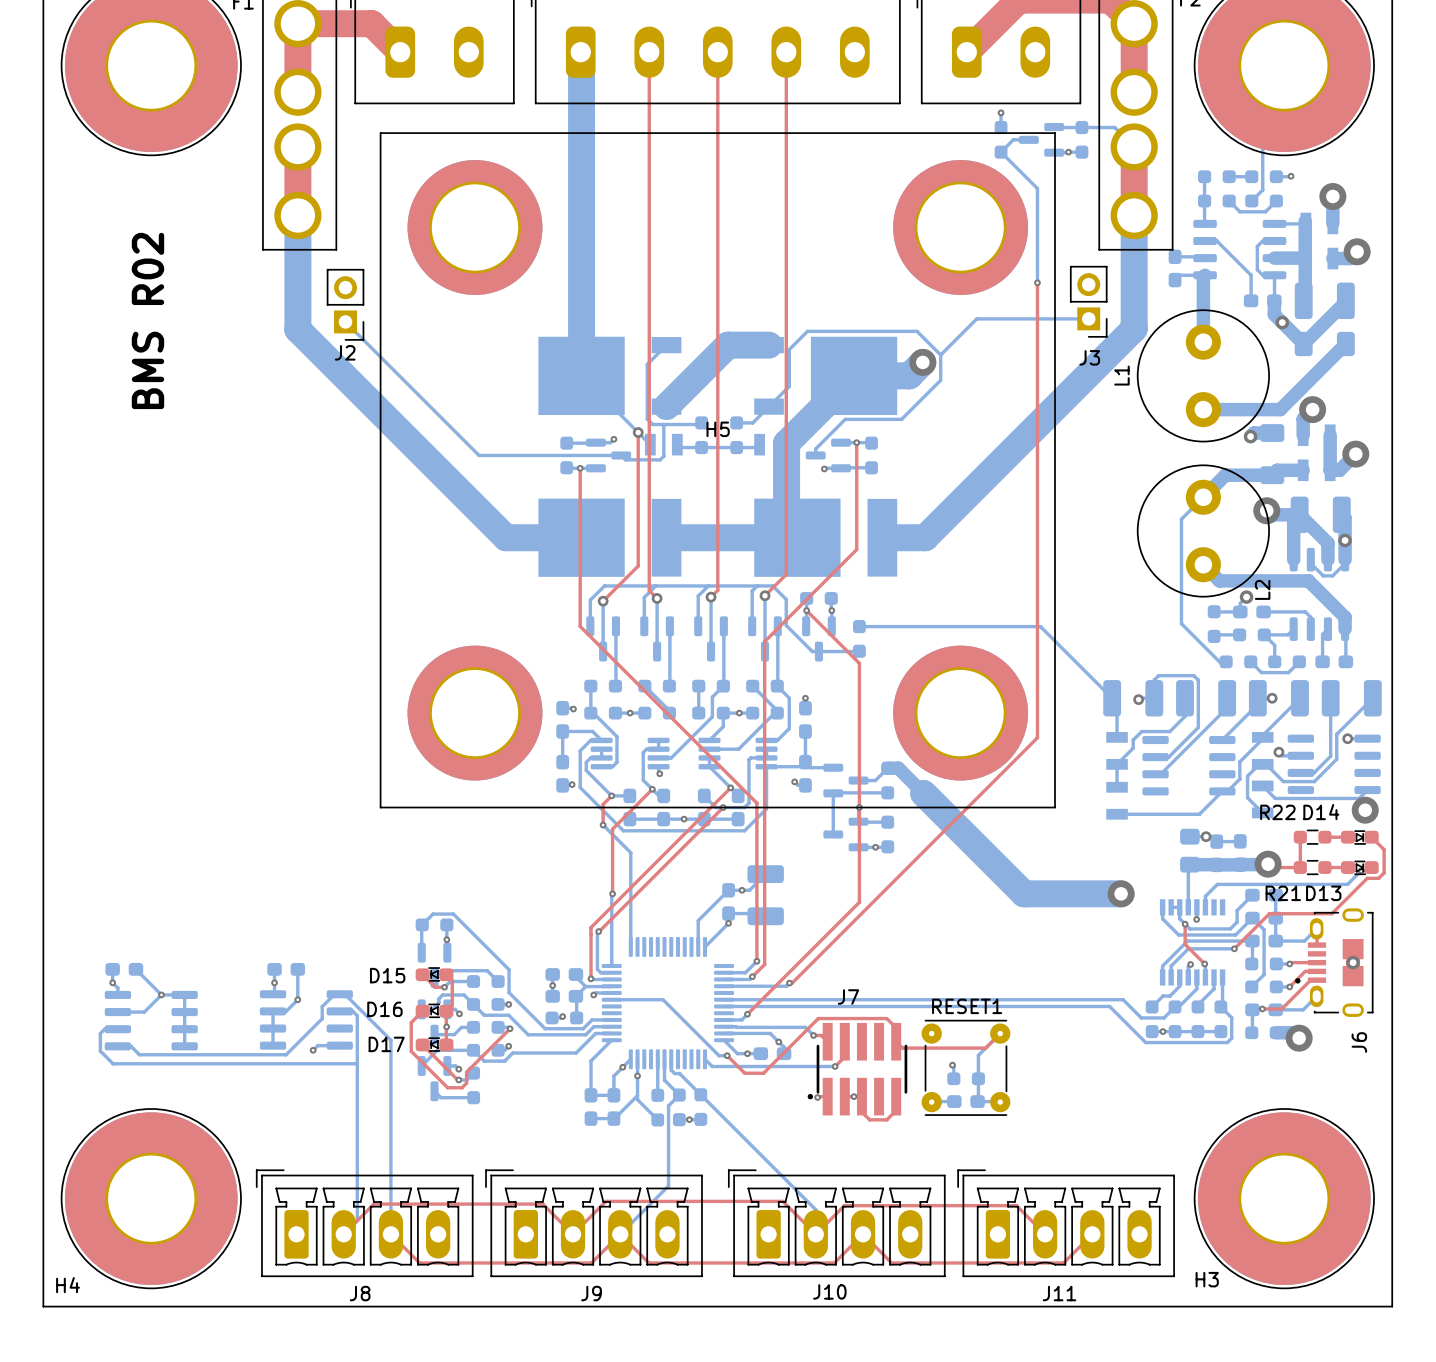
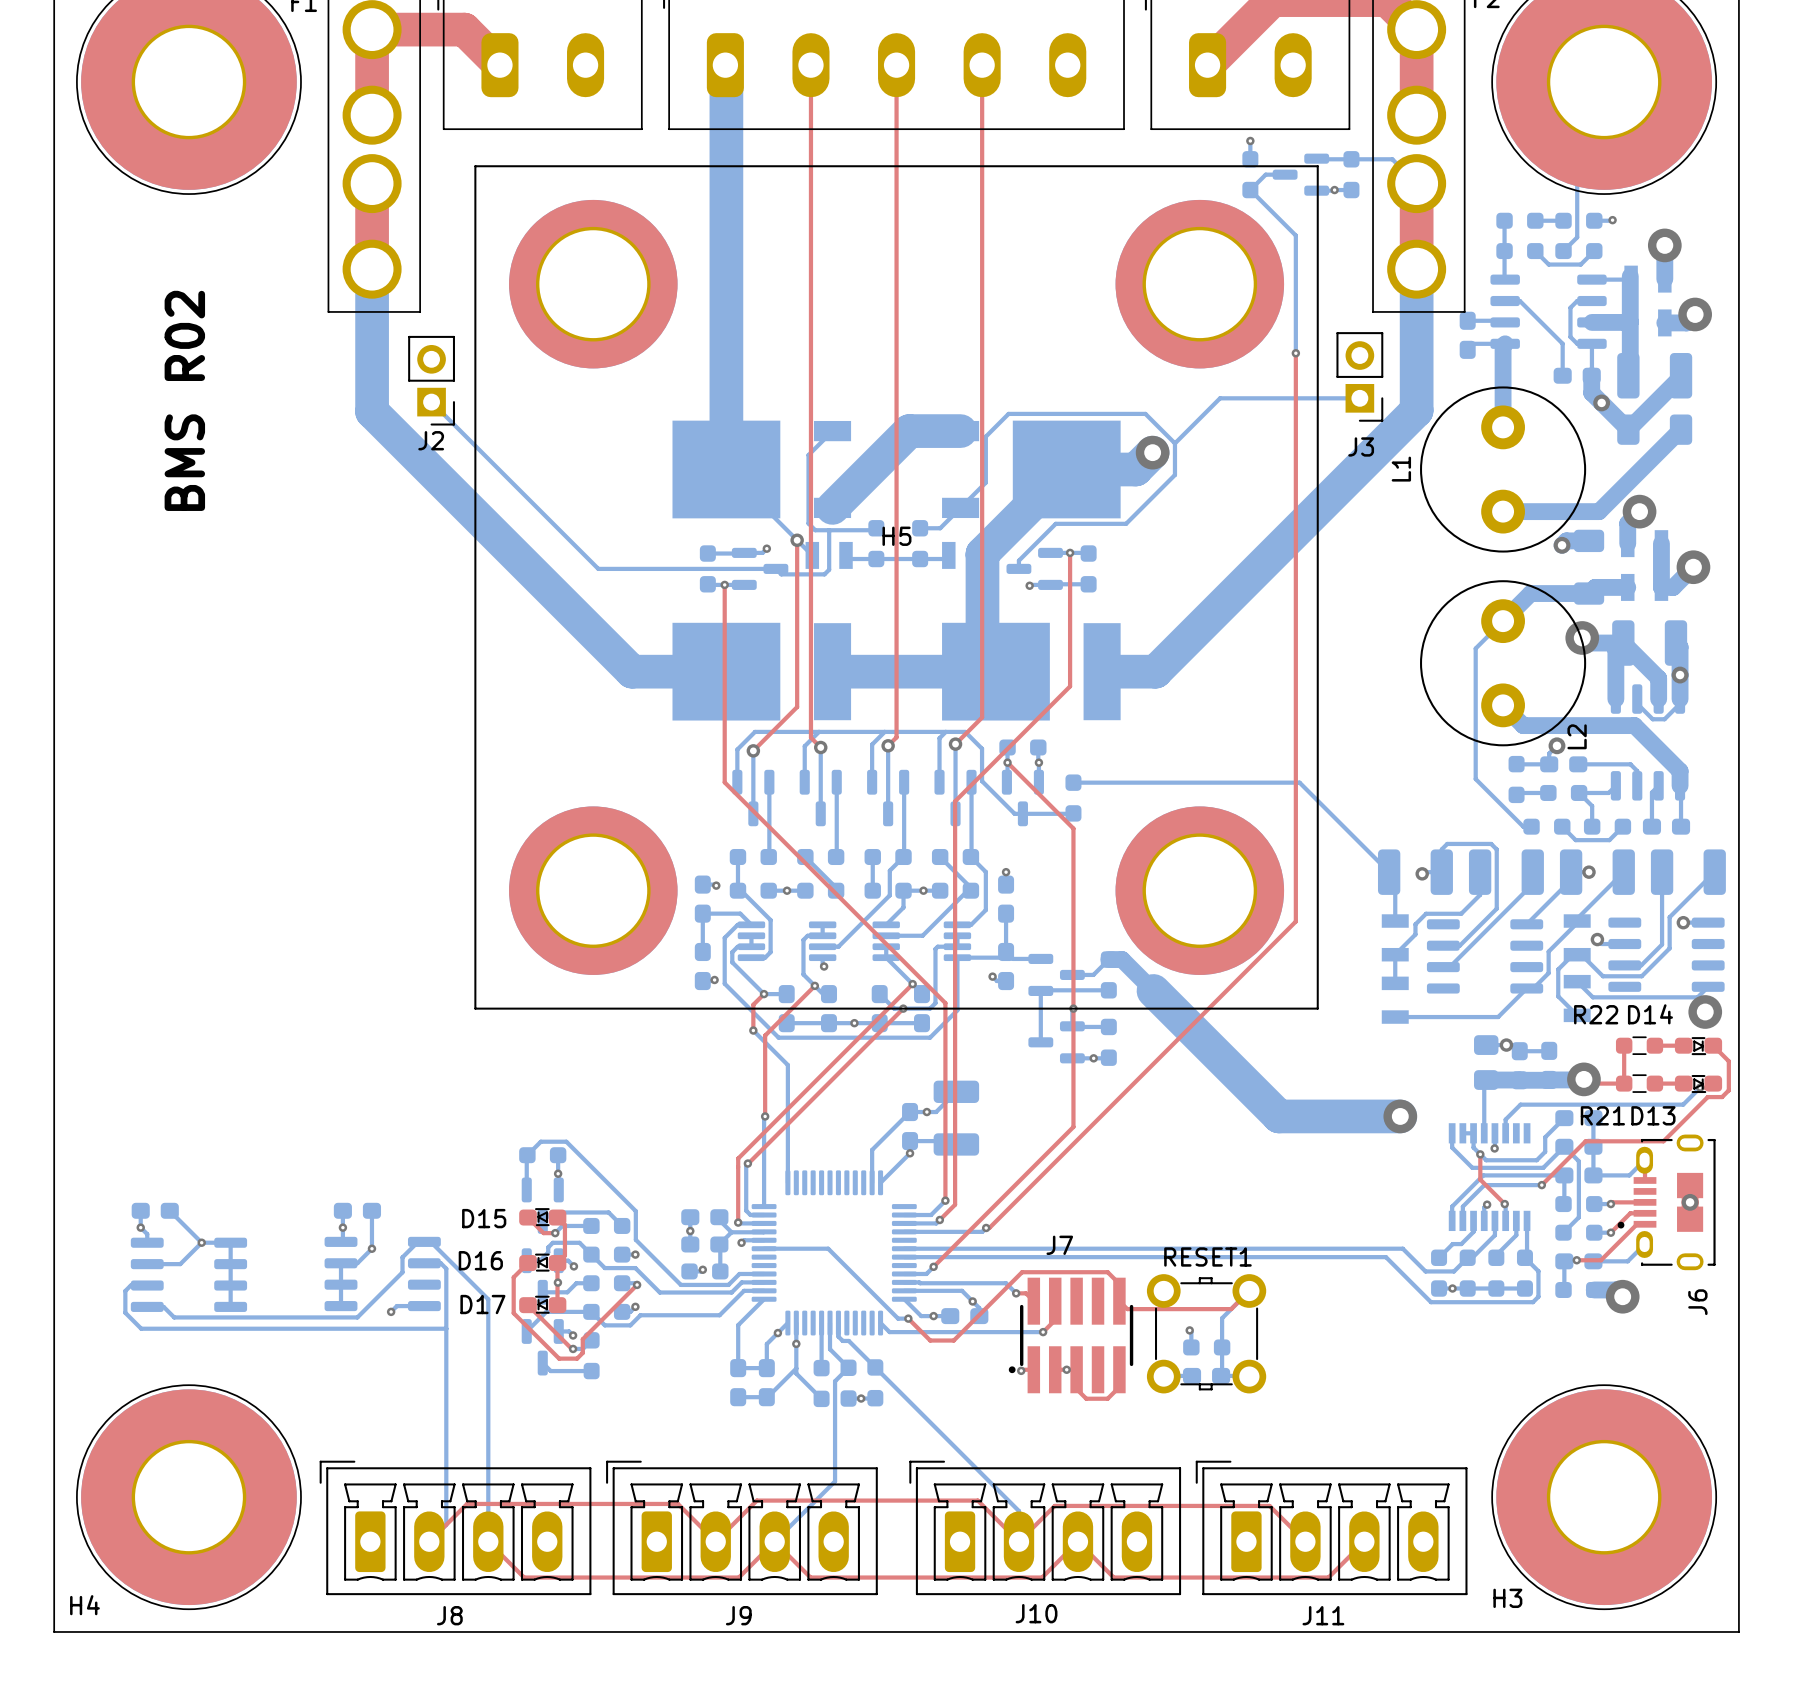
RESET1 footprint: [921, 1019, 1011, 1116] -> [1146, 1274, 1267, 1394]

